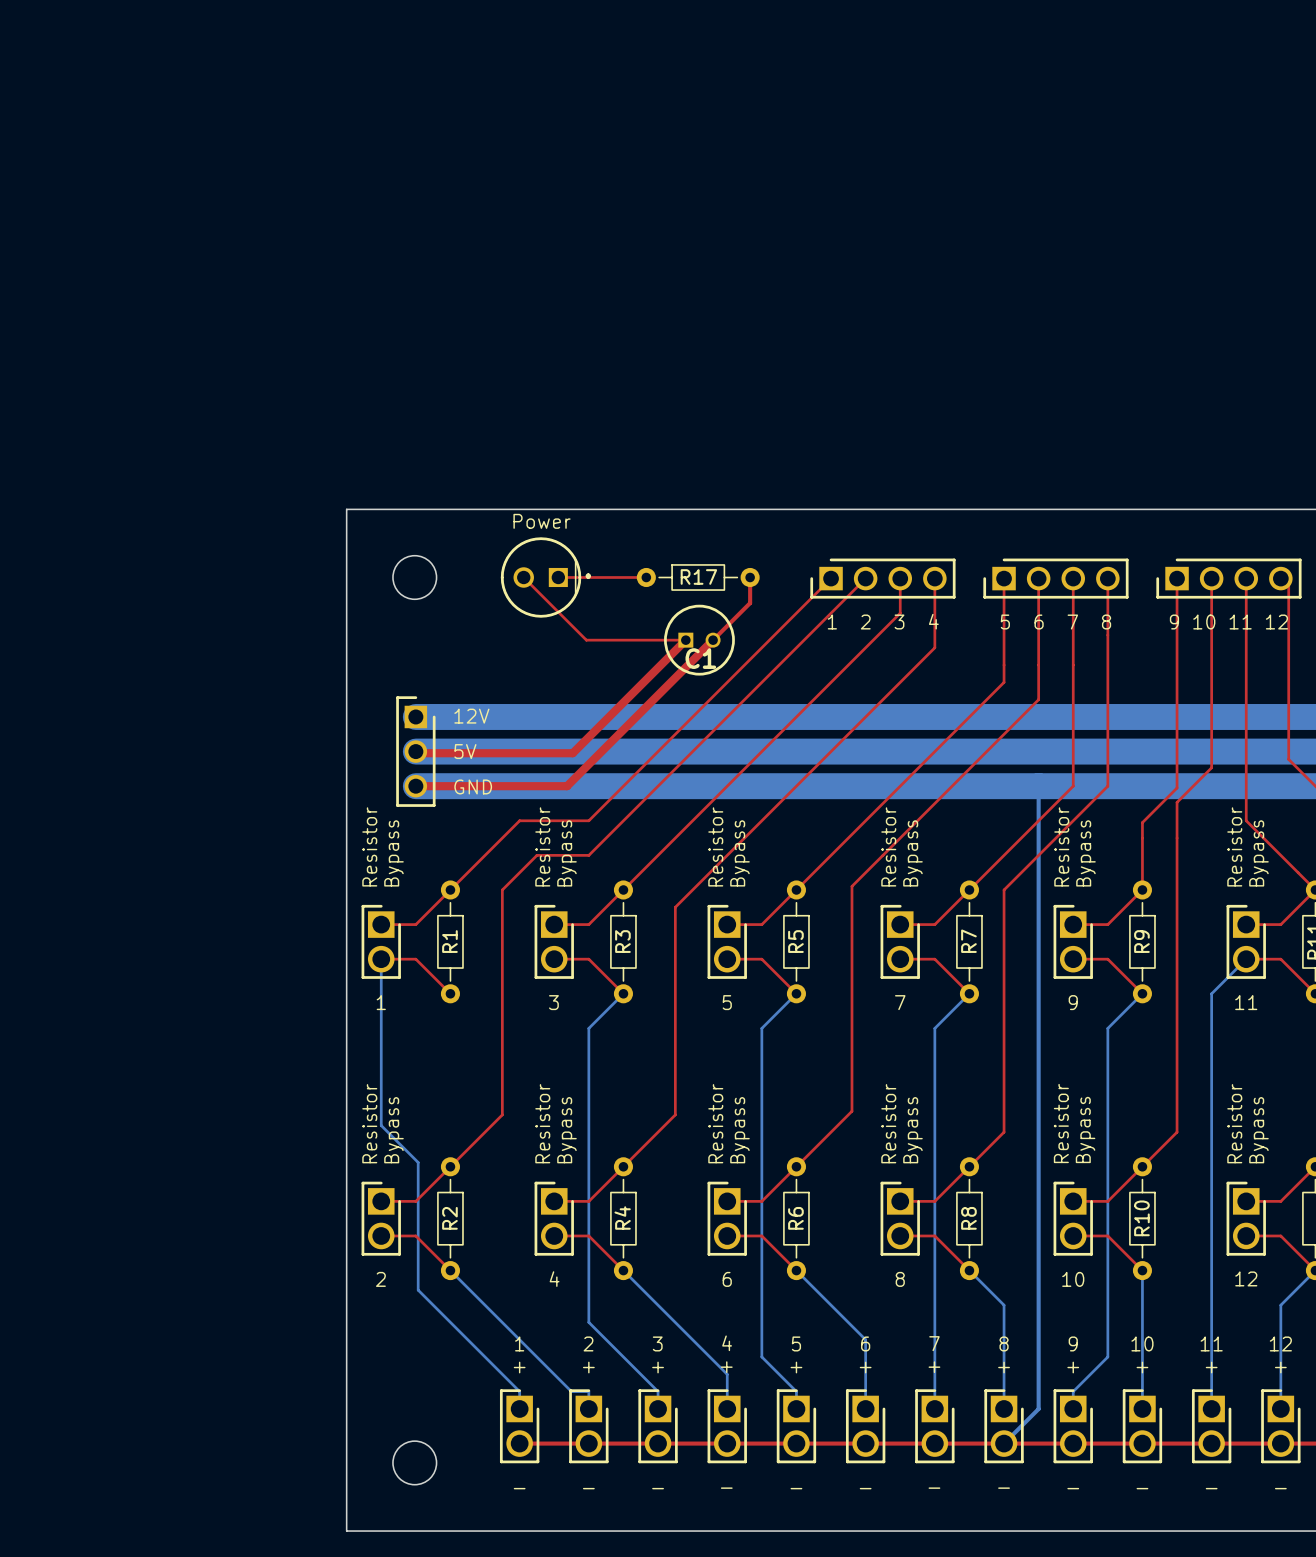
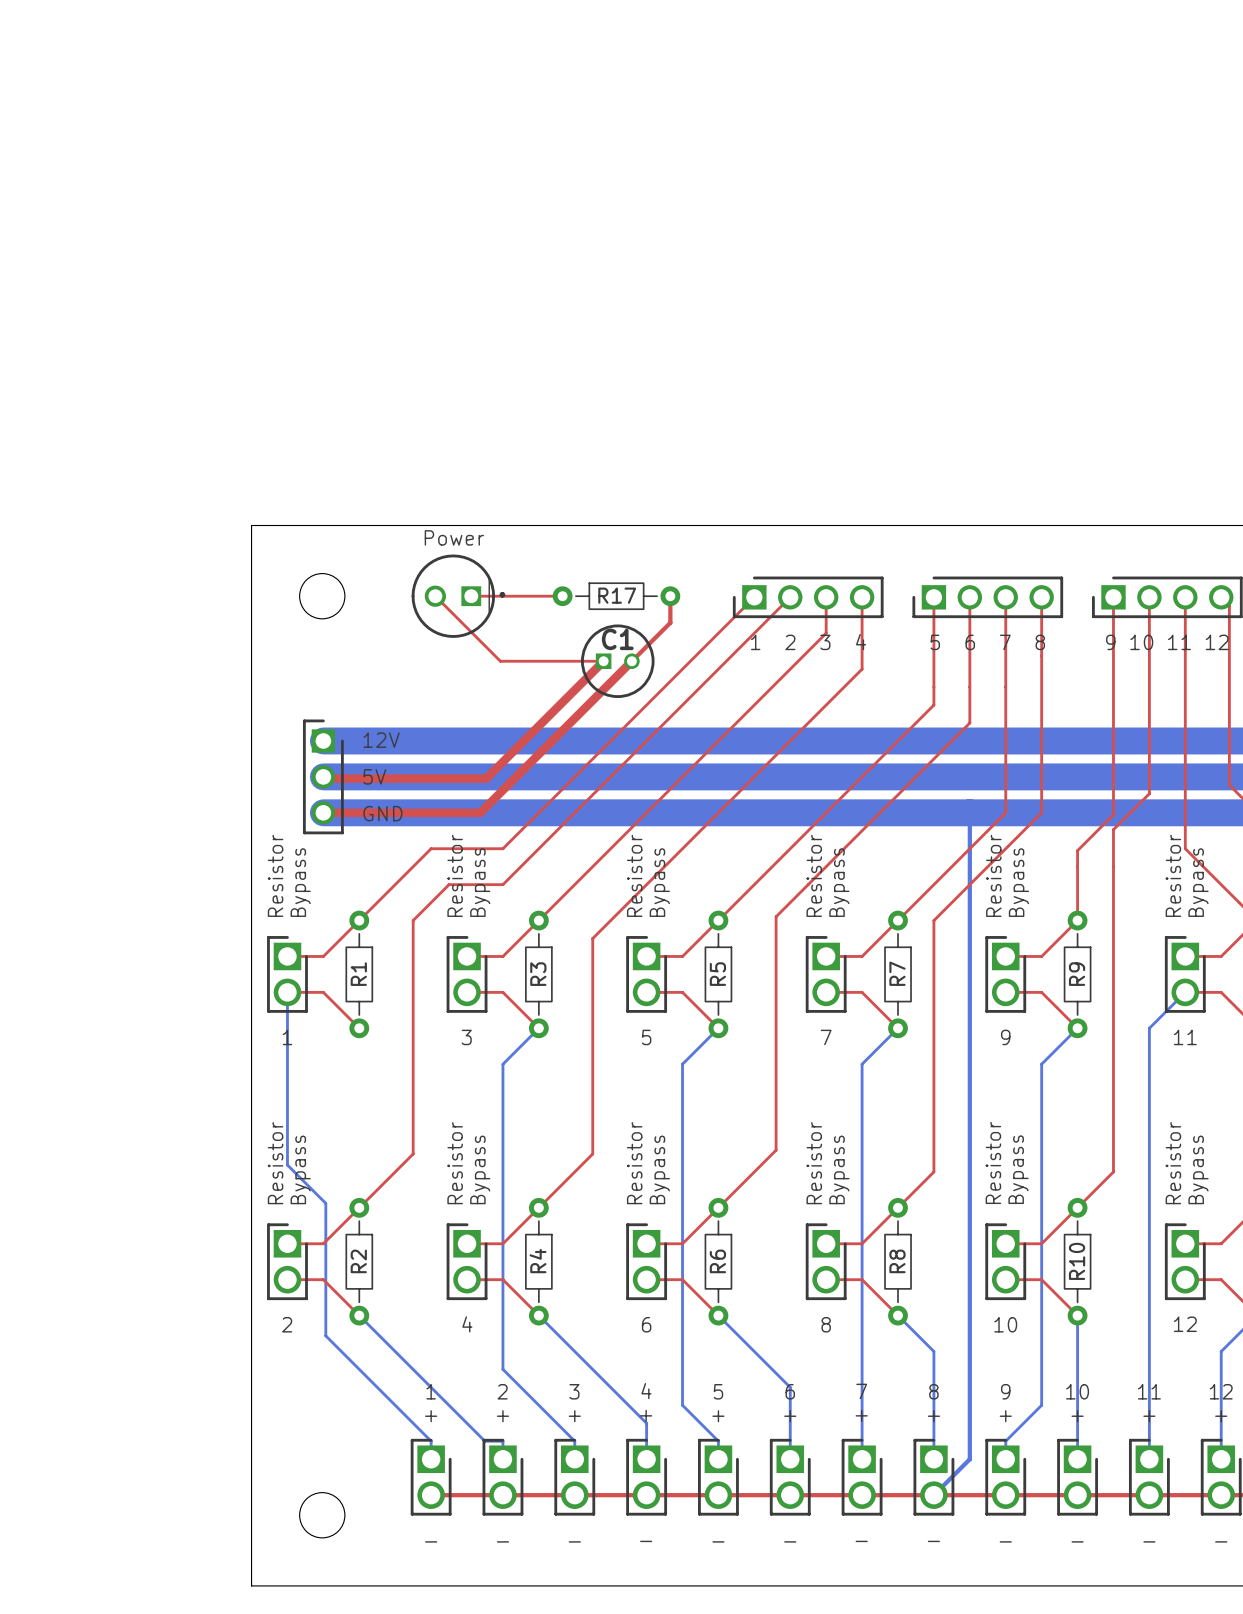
C1 name position: C1 (700, 658) -> C1 (617, 639)

